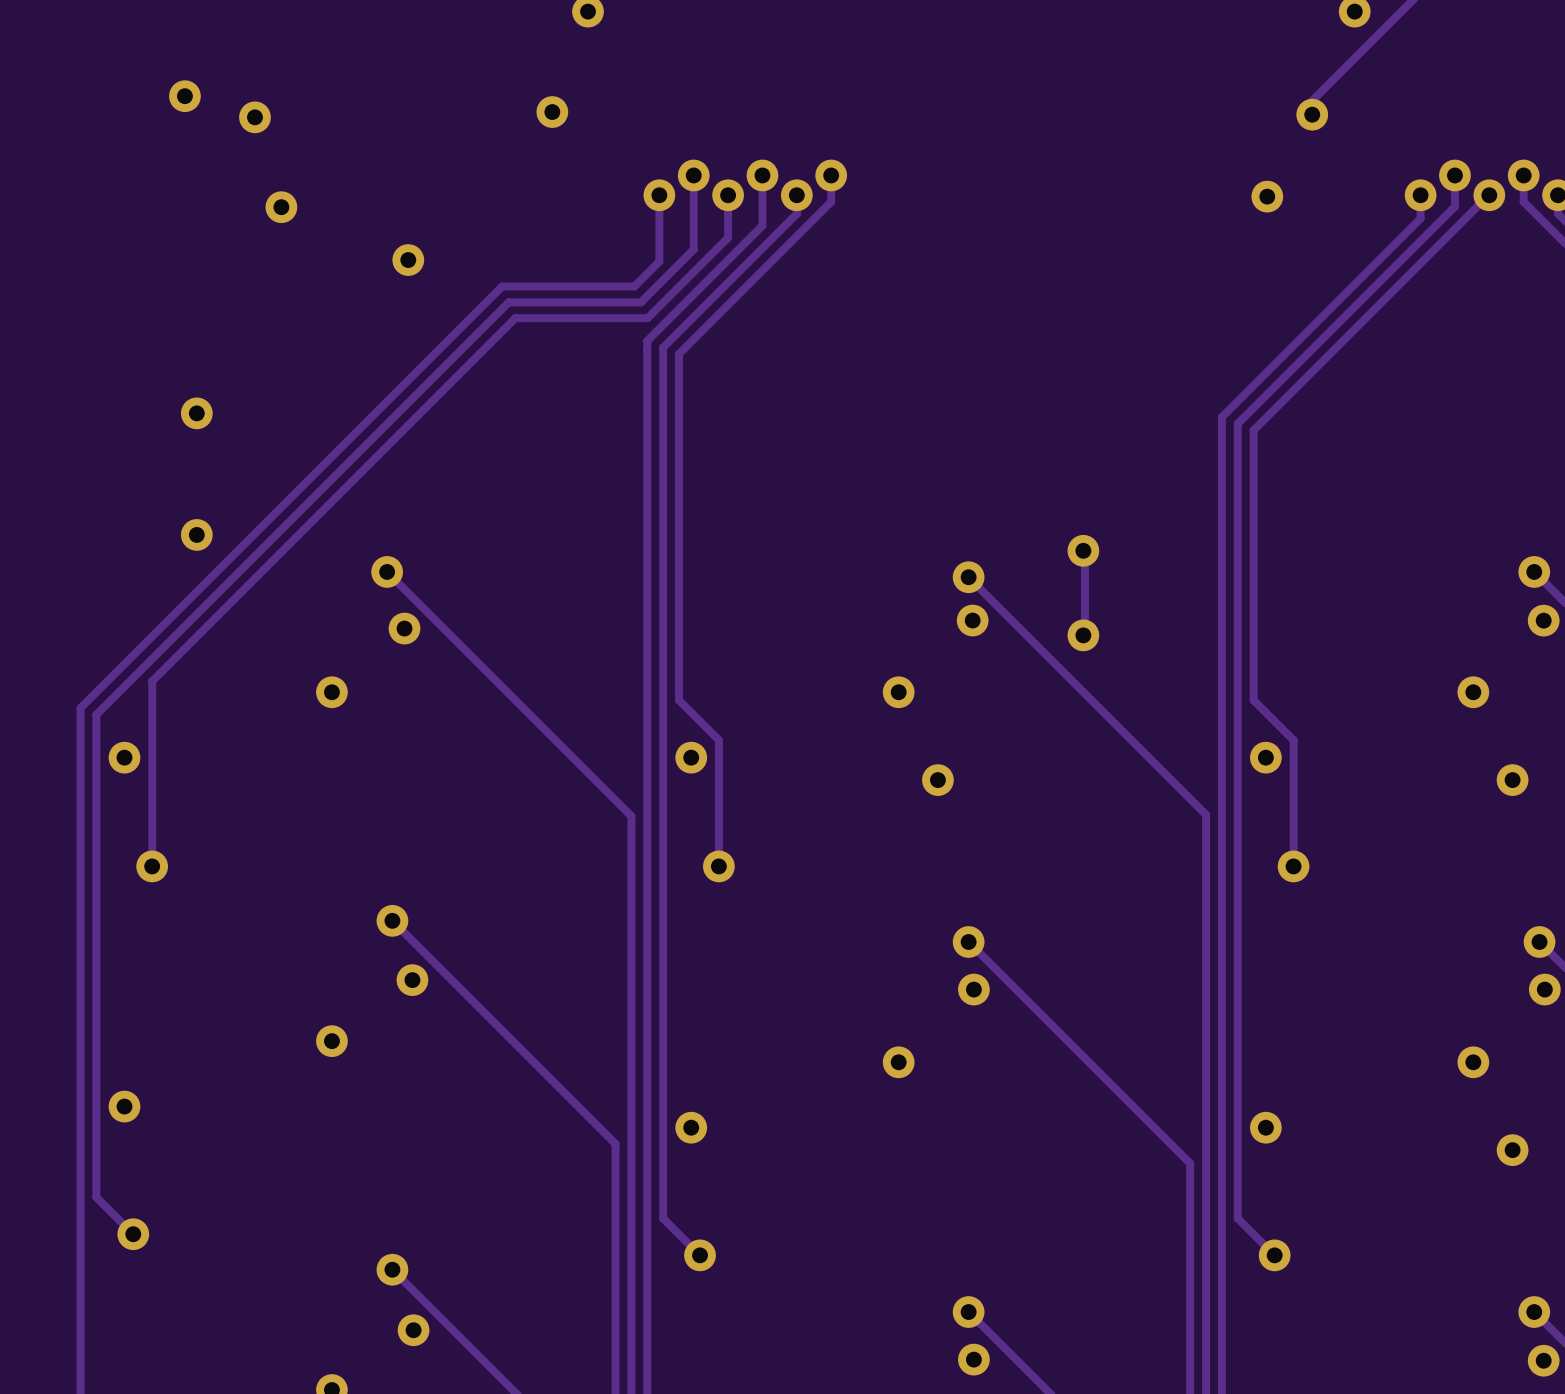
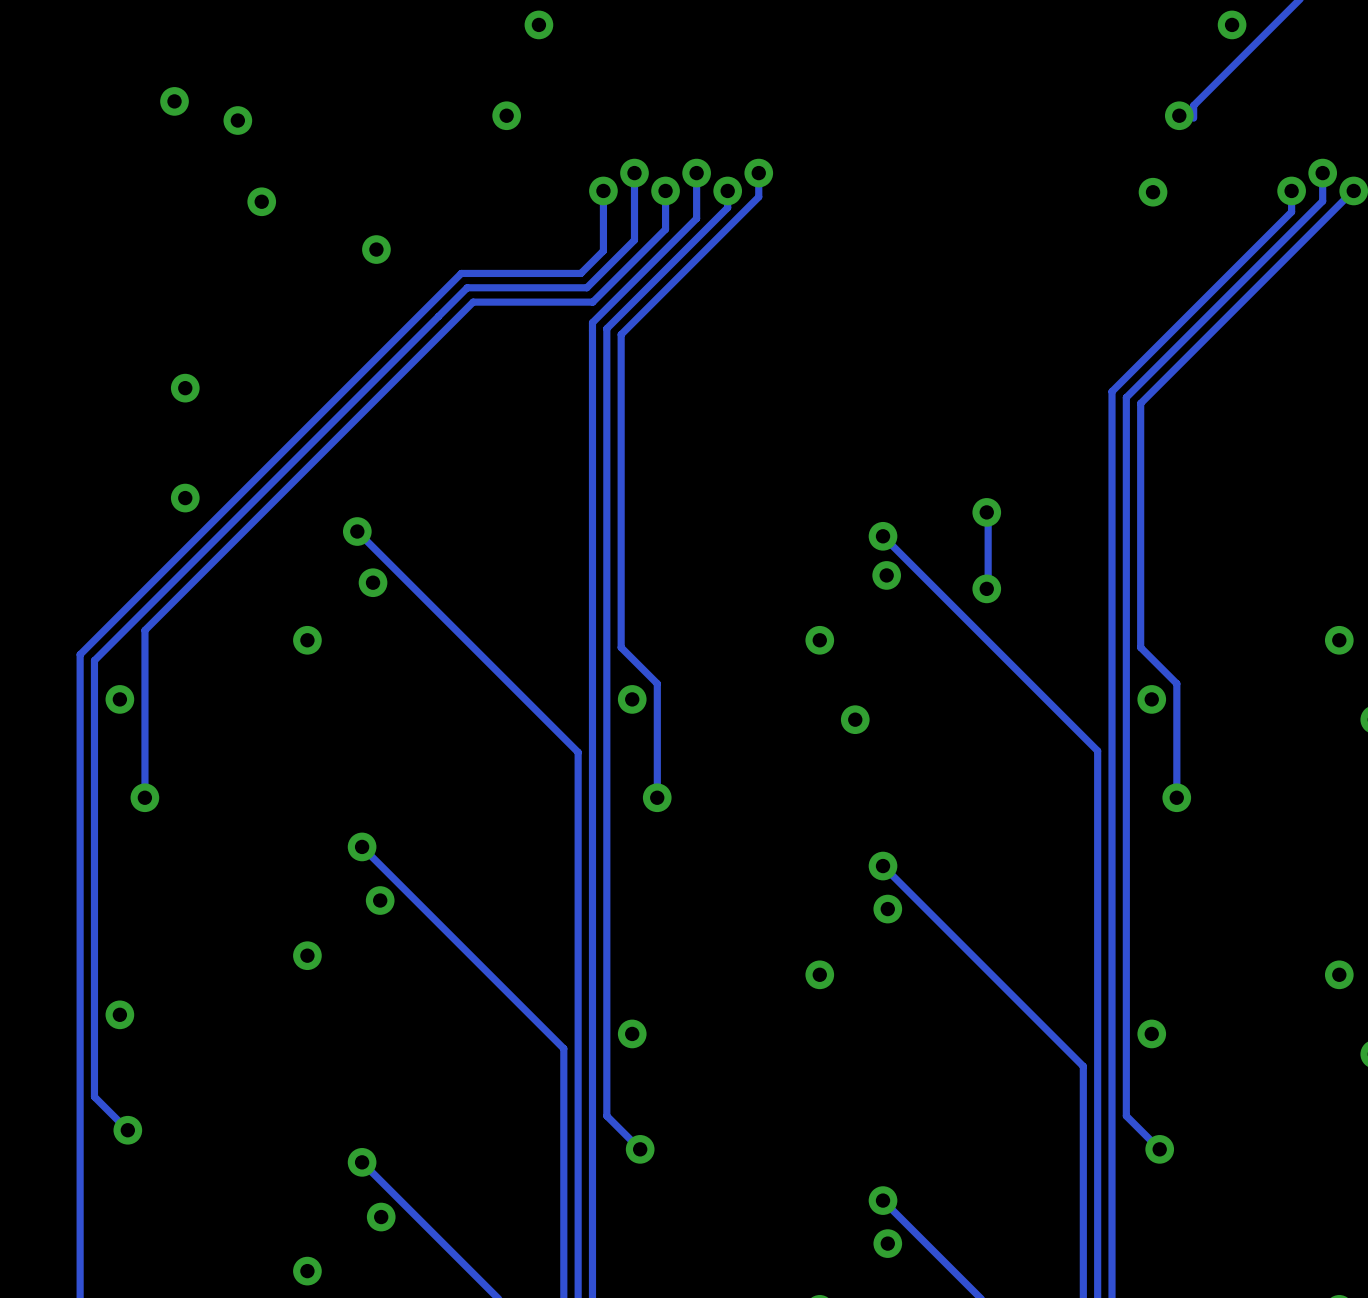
via position: (1312, 114) -> (1179, 115)

